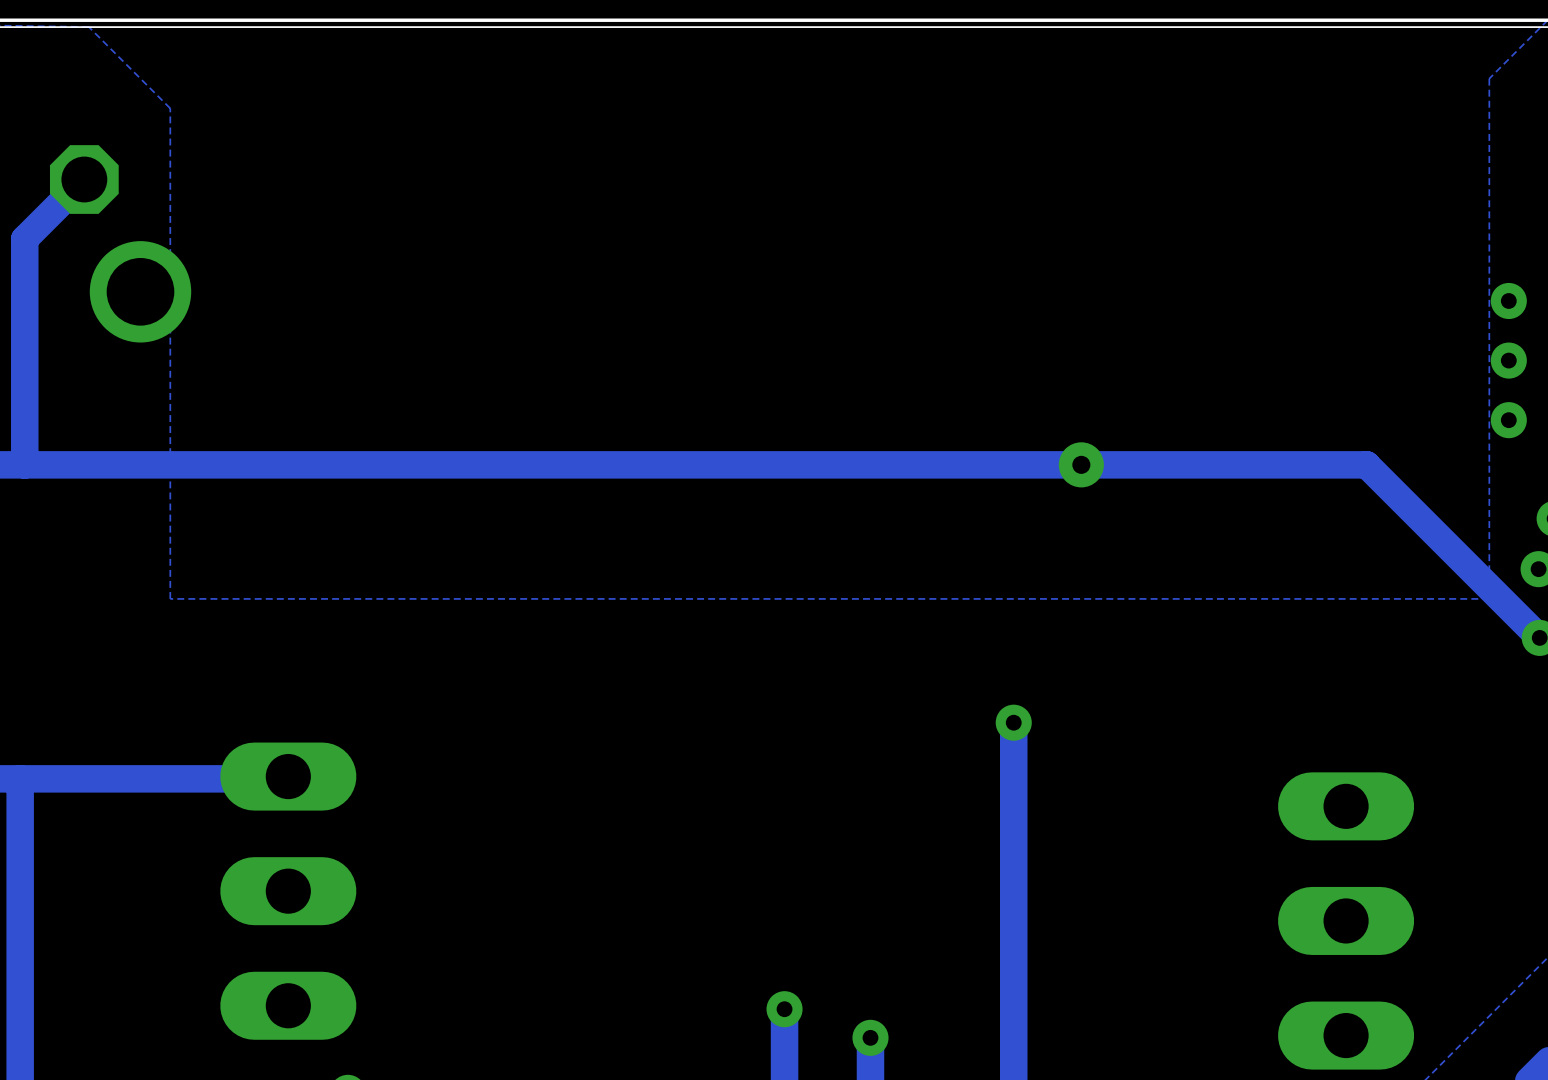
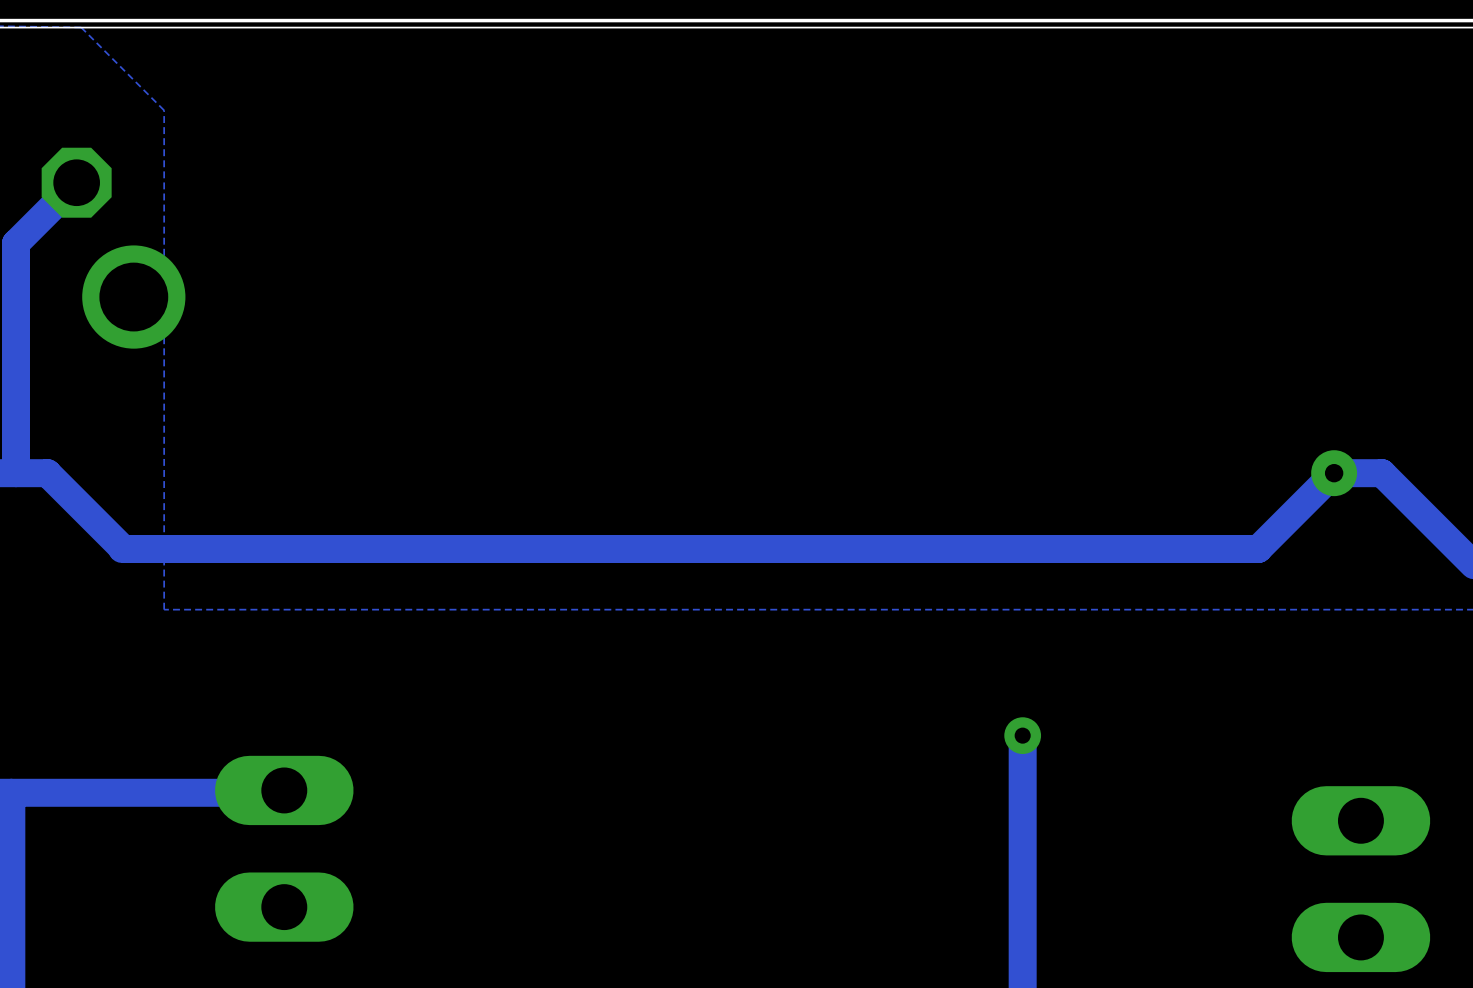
track: none -> (47, 473) (122, 548)
via position: (1081, 464) -> (1334, 473)
track: (1319, 464) (55, 464) -> (1334, 473) (1258, 548) (122, 548)

